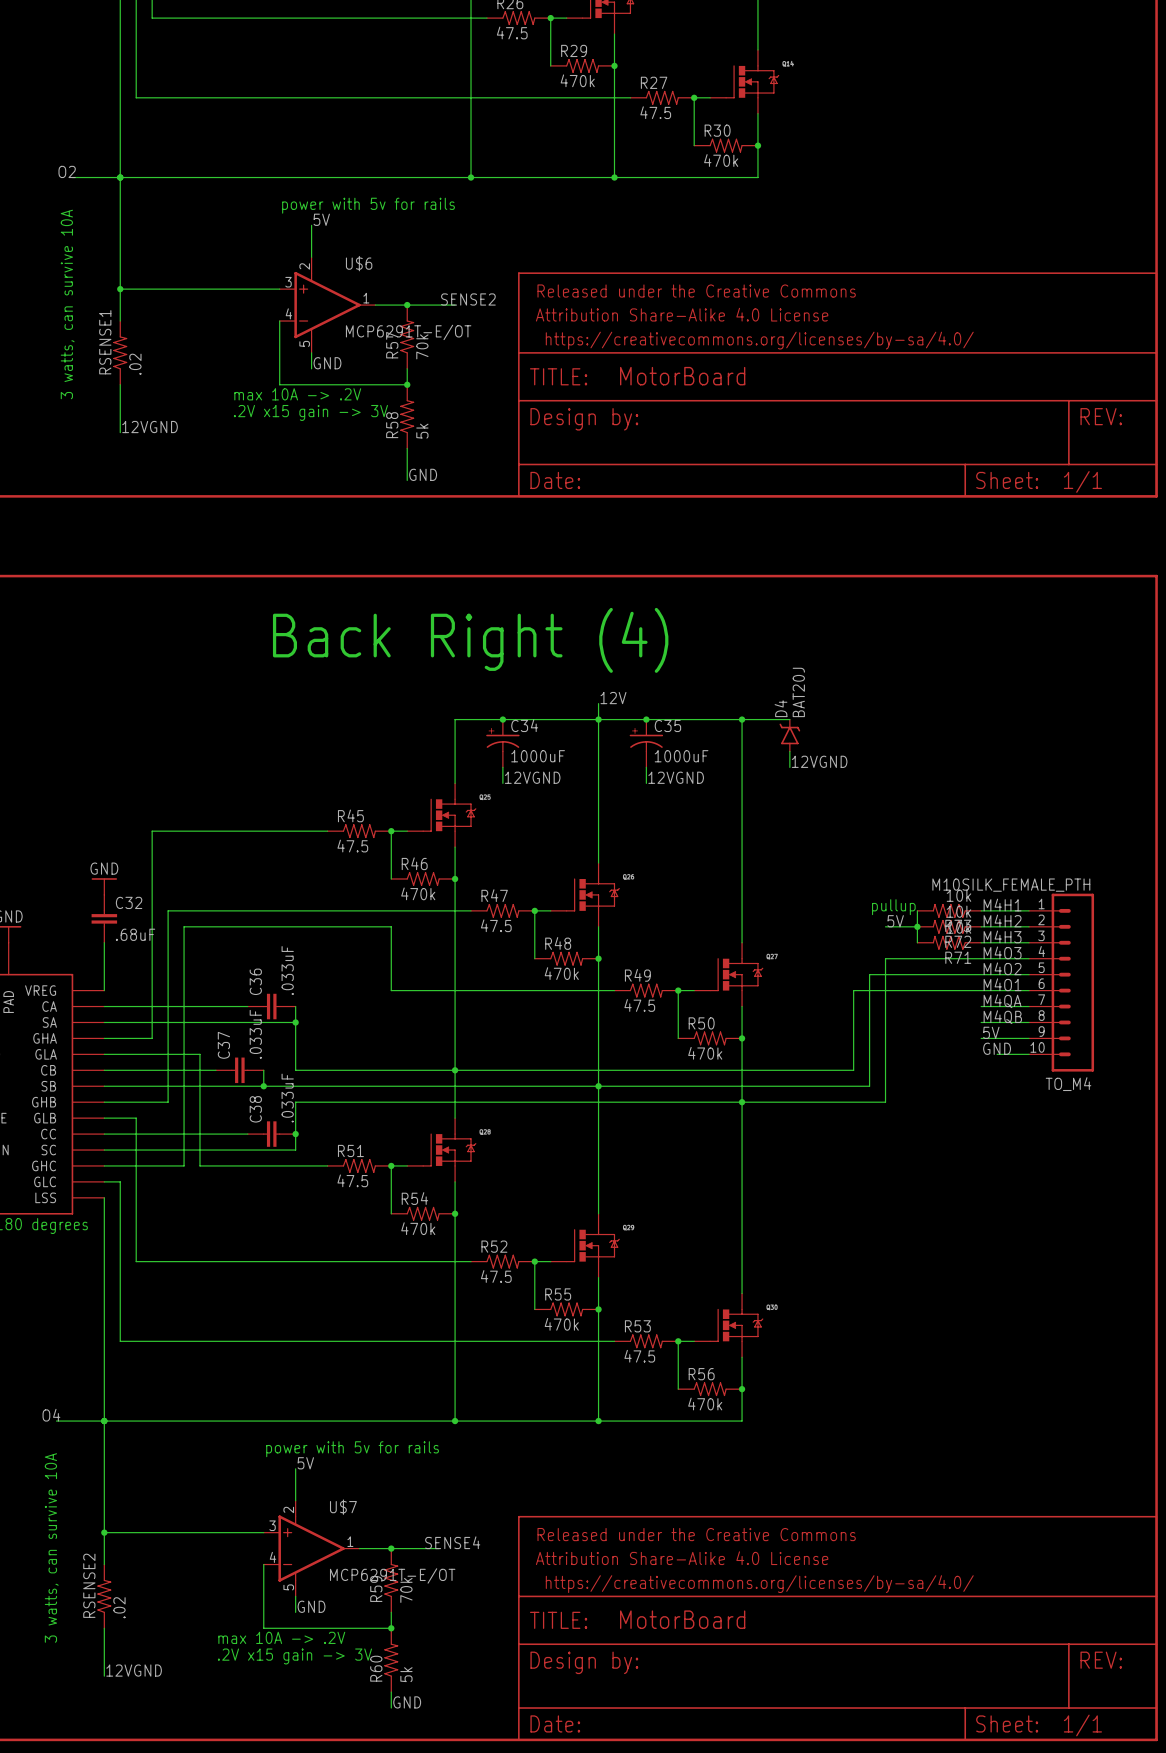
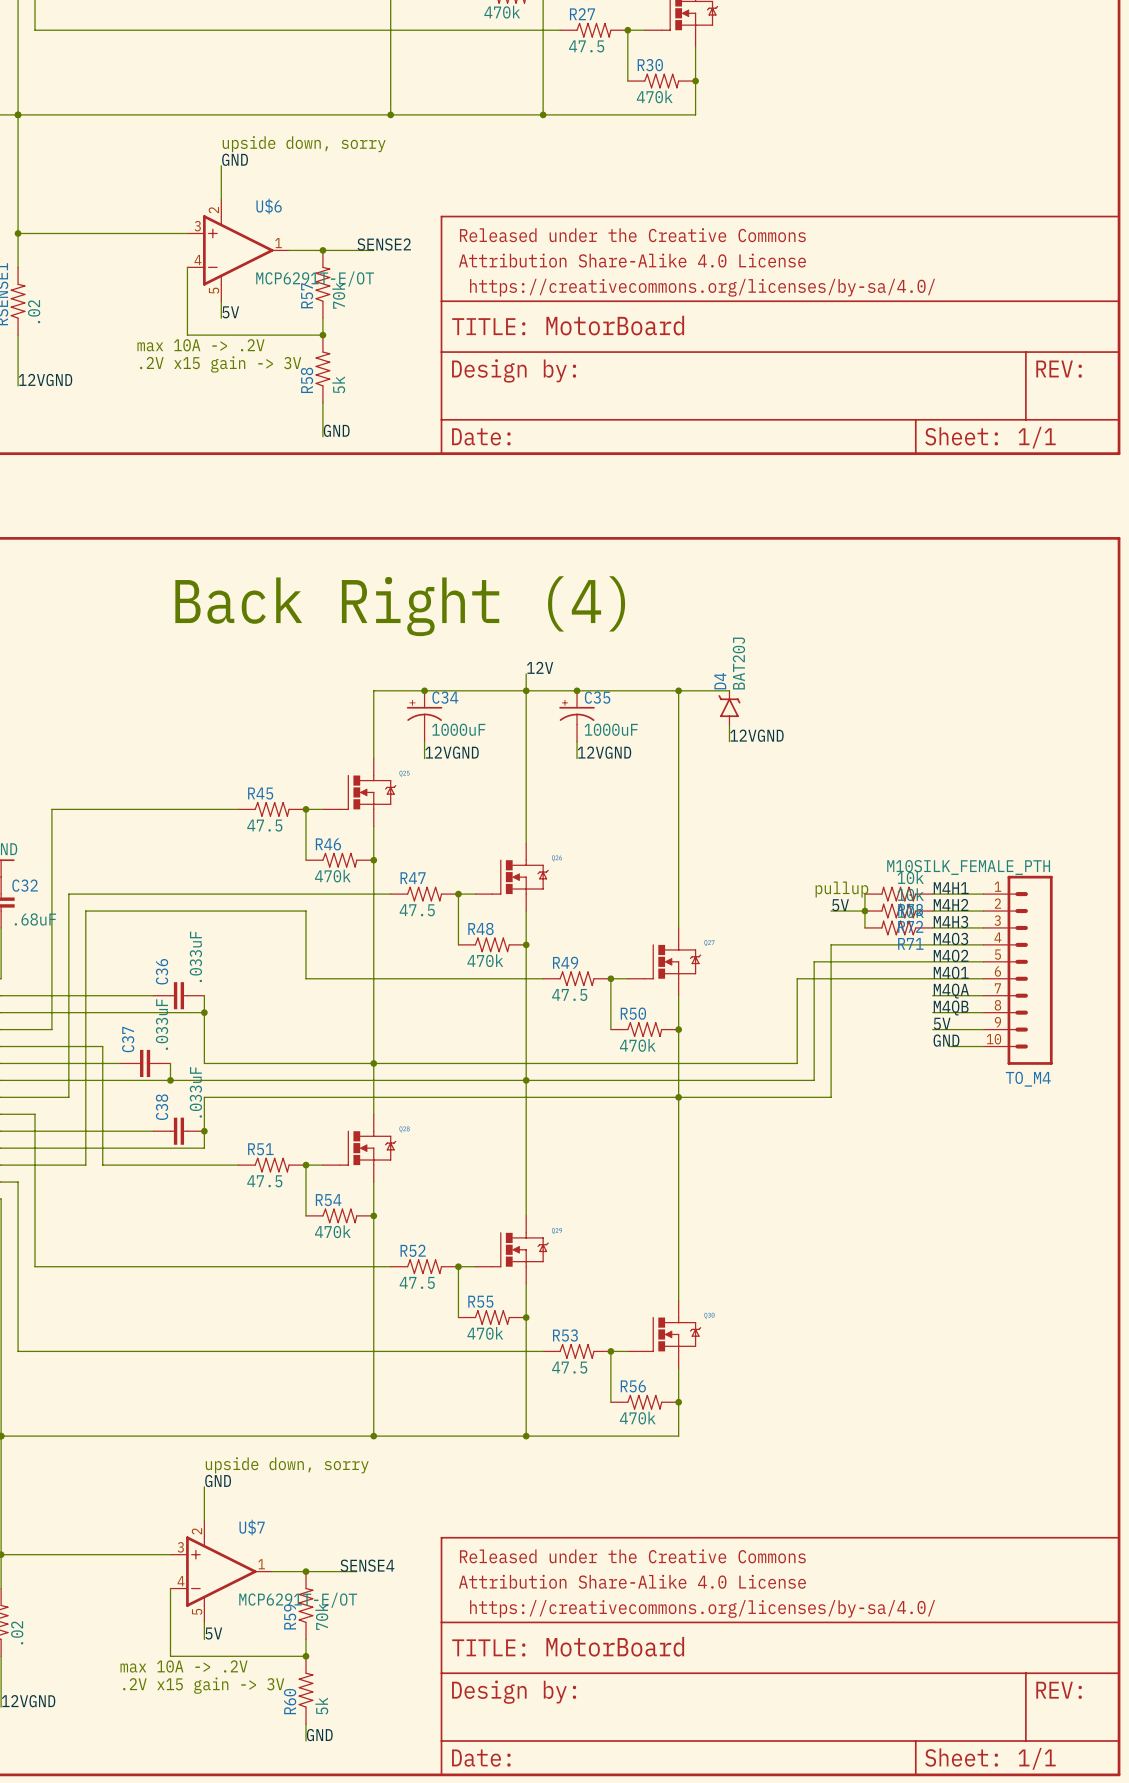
text: power with 5v for rails (368, 205) -> none
text: none -> upside down, sorry (304, 144)
label: 5V (321, 219) -> GND (235, 159)
label: GND (327, 363) -> 5V (230, 312)
text: power with 5v for rails (352, 1449) -> none
text: none -> upside down, sorry (287, 1465)
label: 5V (305, 1463) -> GND (218, 1480)
label: GND (311, 1606) -> 5V (213, 1633)

